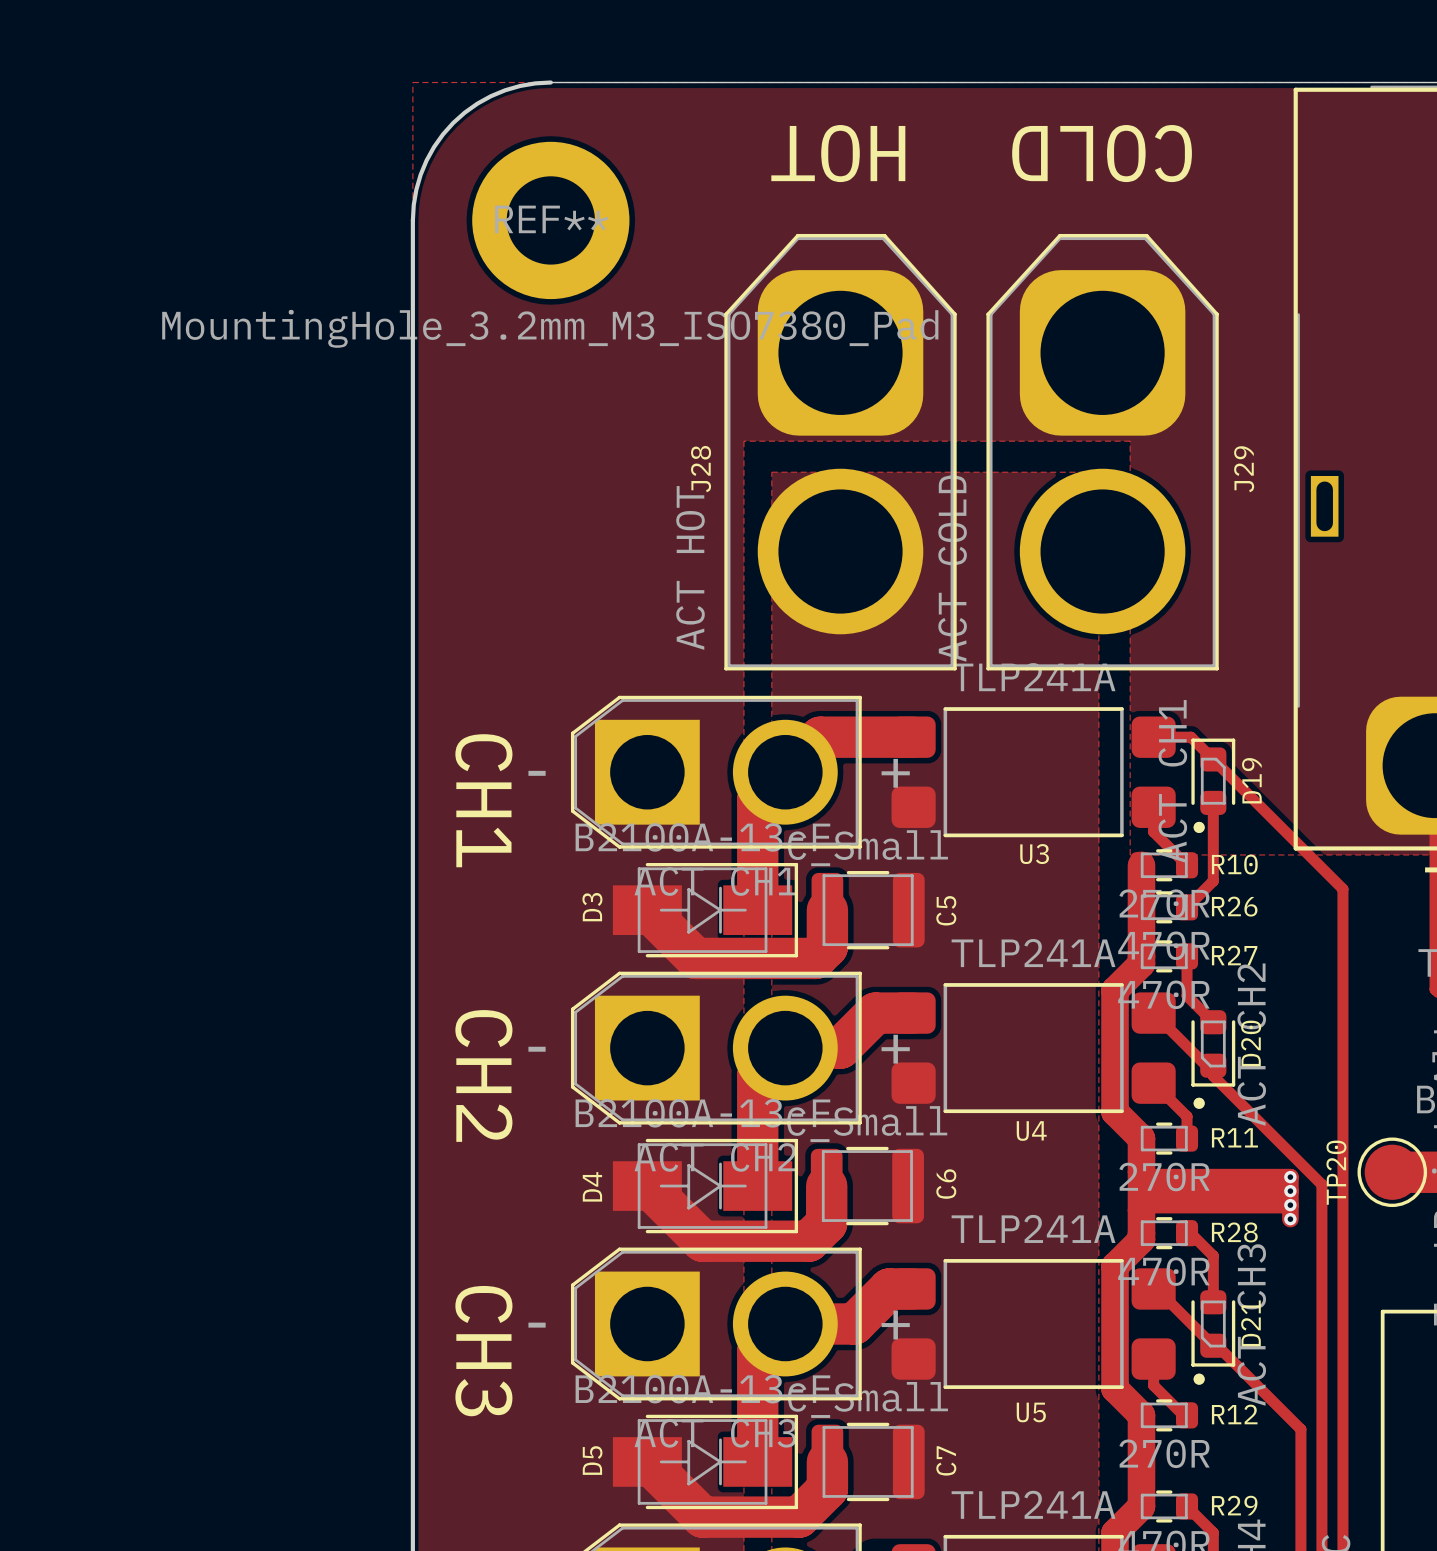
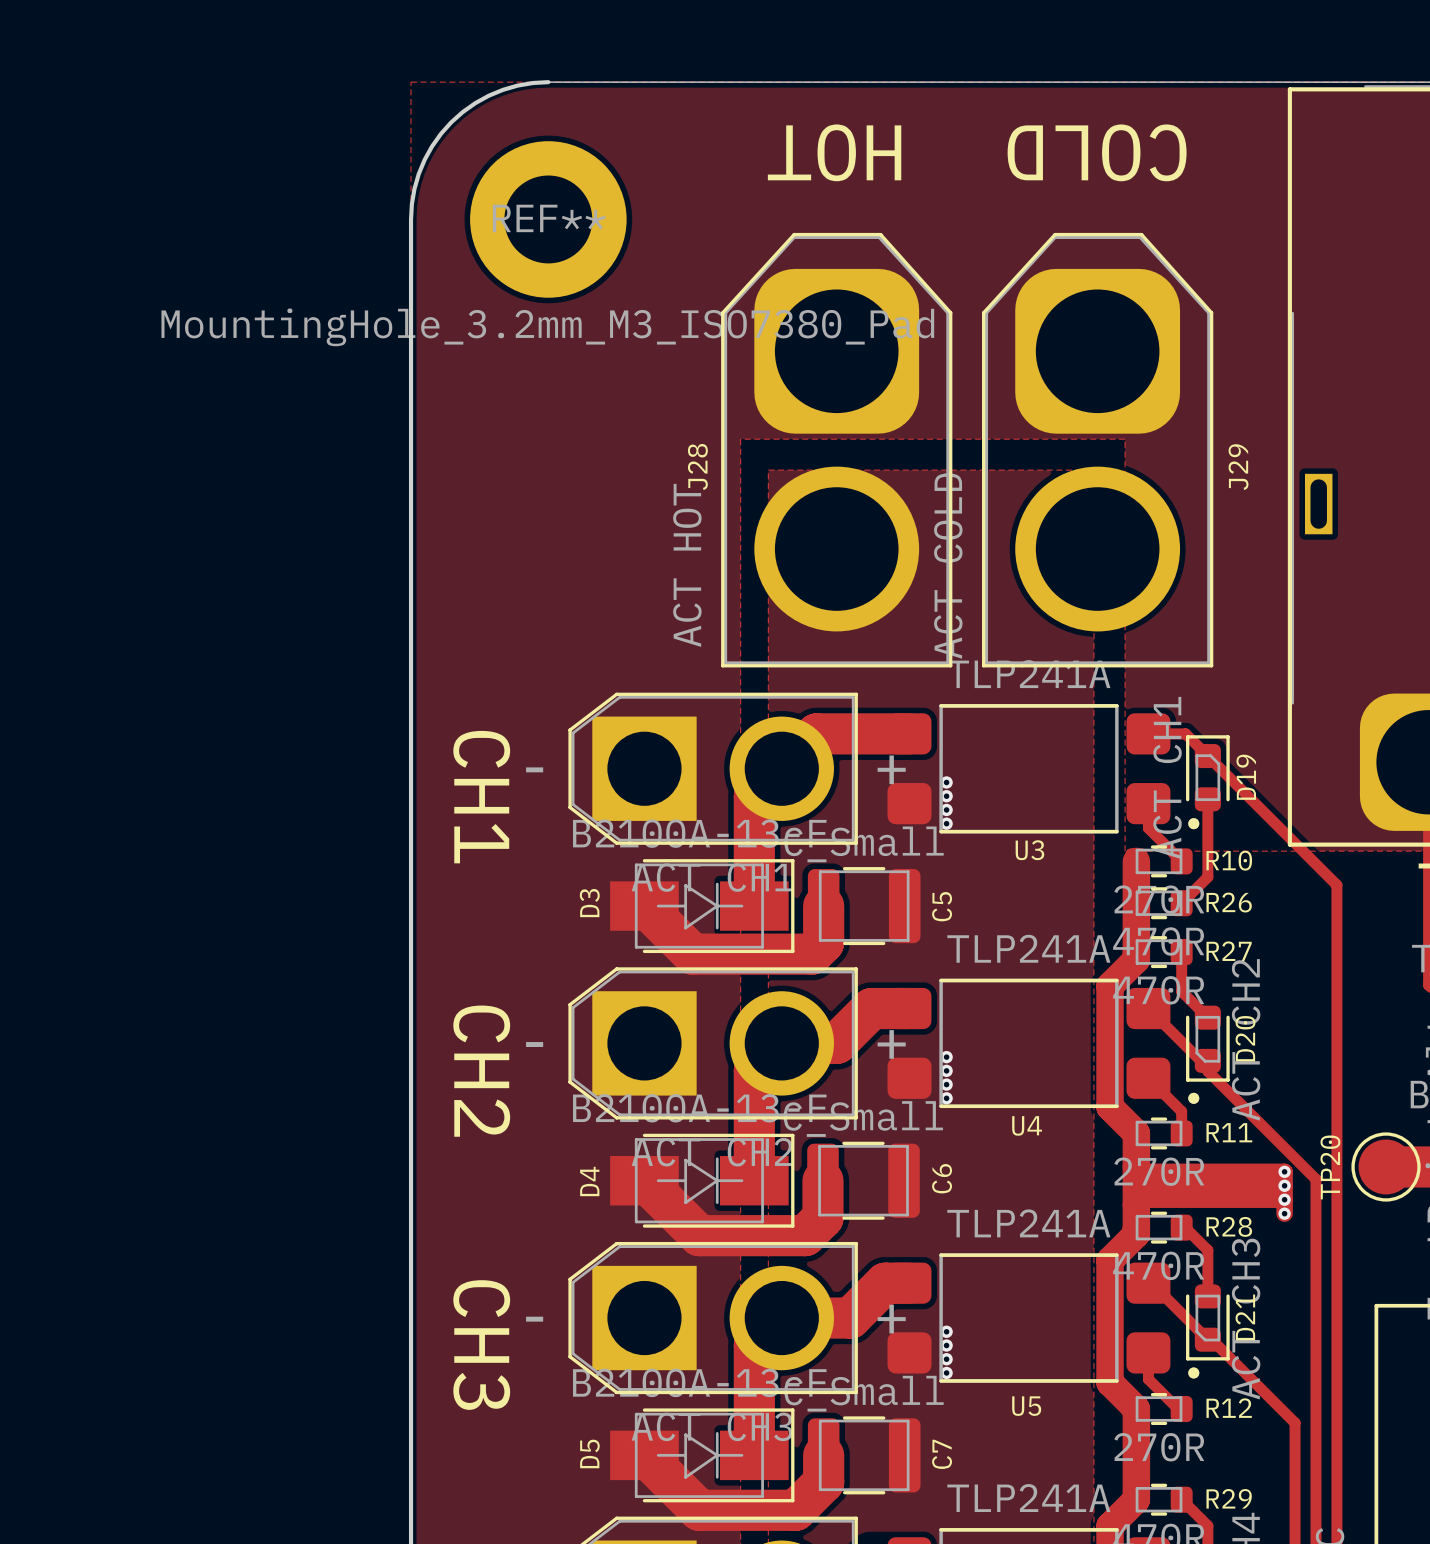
via: none -> (946, 782)
via: none -> (946, 796)
via: none -> (946, 809)
via: none -> (946, 823)
via: none -> (946, 1057)
via: none -> (946, 1070)
via: none -> (946, 1084)
via: none -> (946, 1098)
via: none -> (946, 1331)
via: none -> (946, 1345)
via: none -> (946, 1359)
via: none -> (946, 1372)

